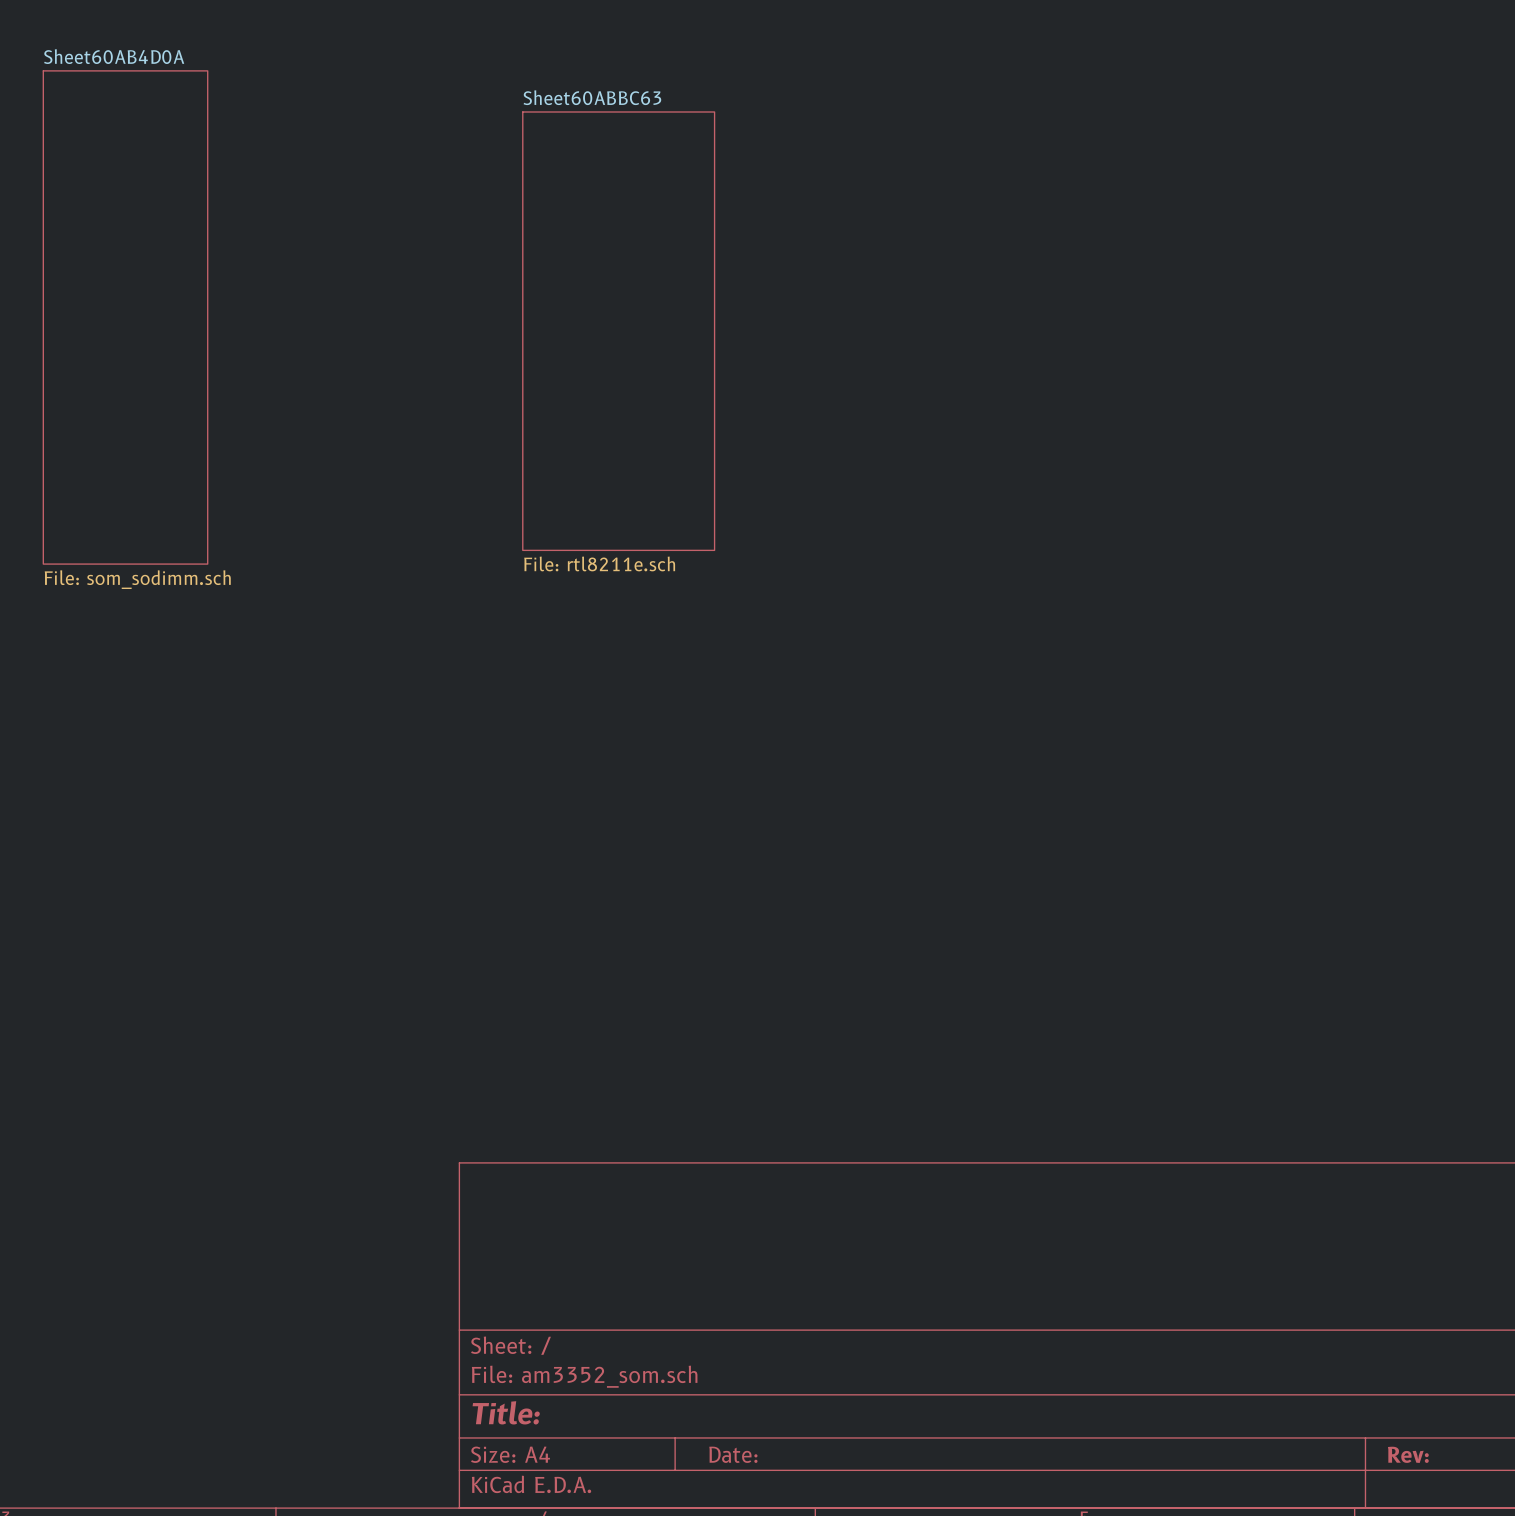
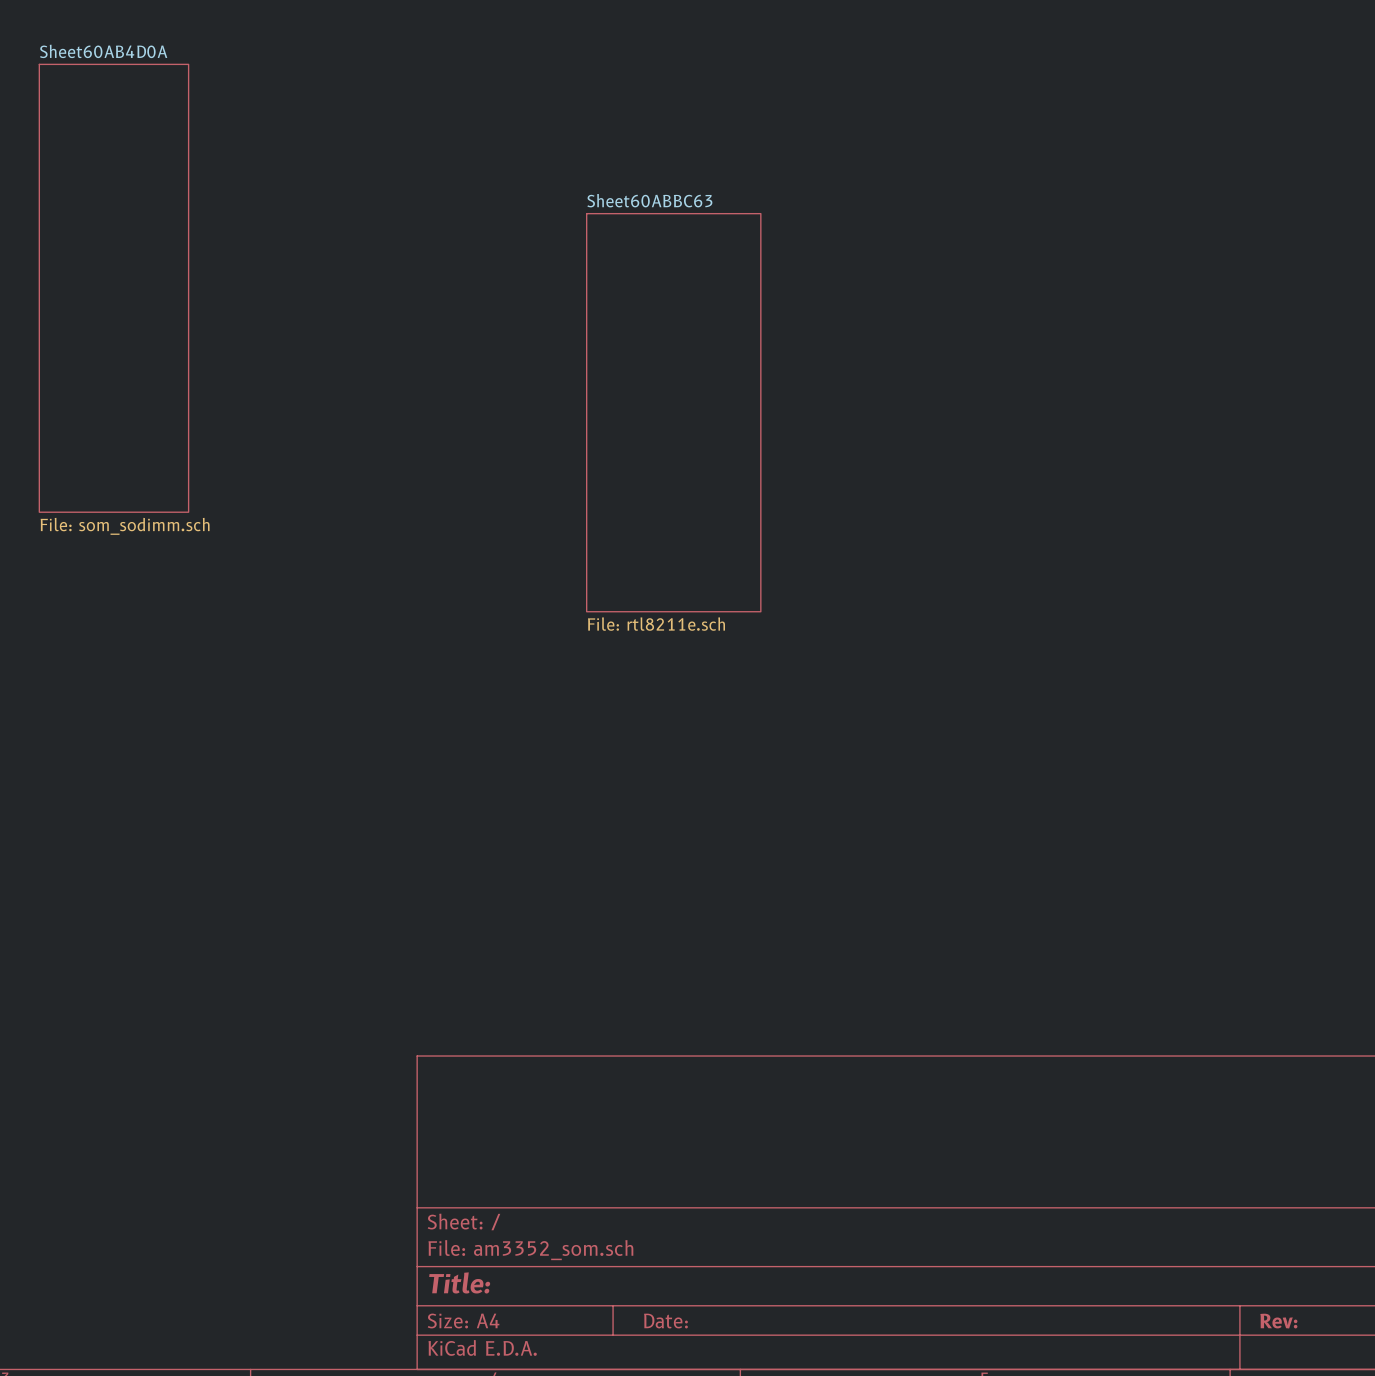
sheet Sheet60ABBC63 position: (618, 331) -> (673, 412)

